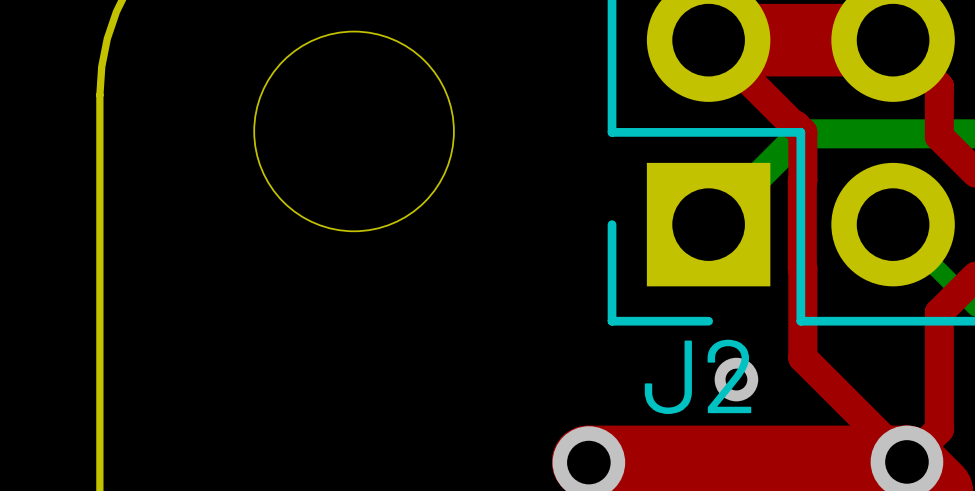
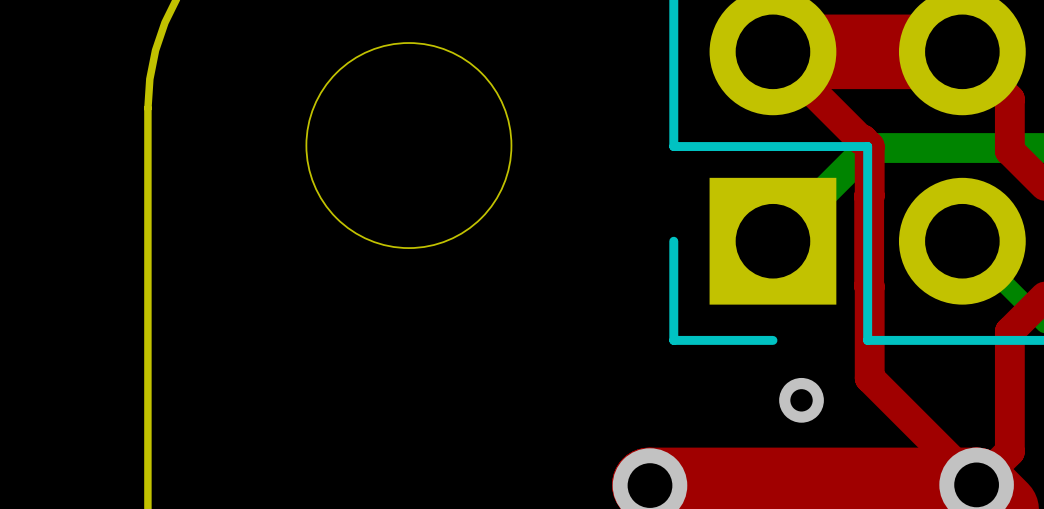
J2 name: J2 (698, 376) -> none

